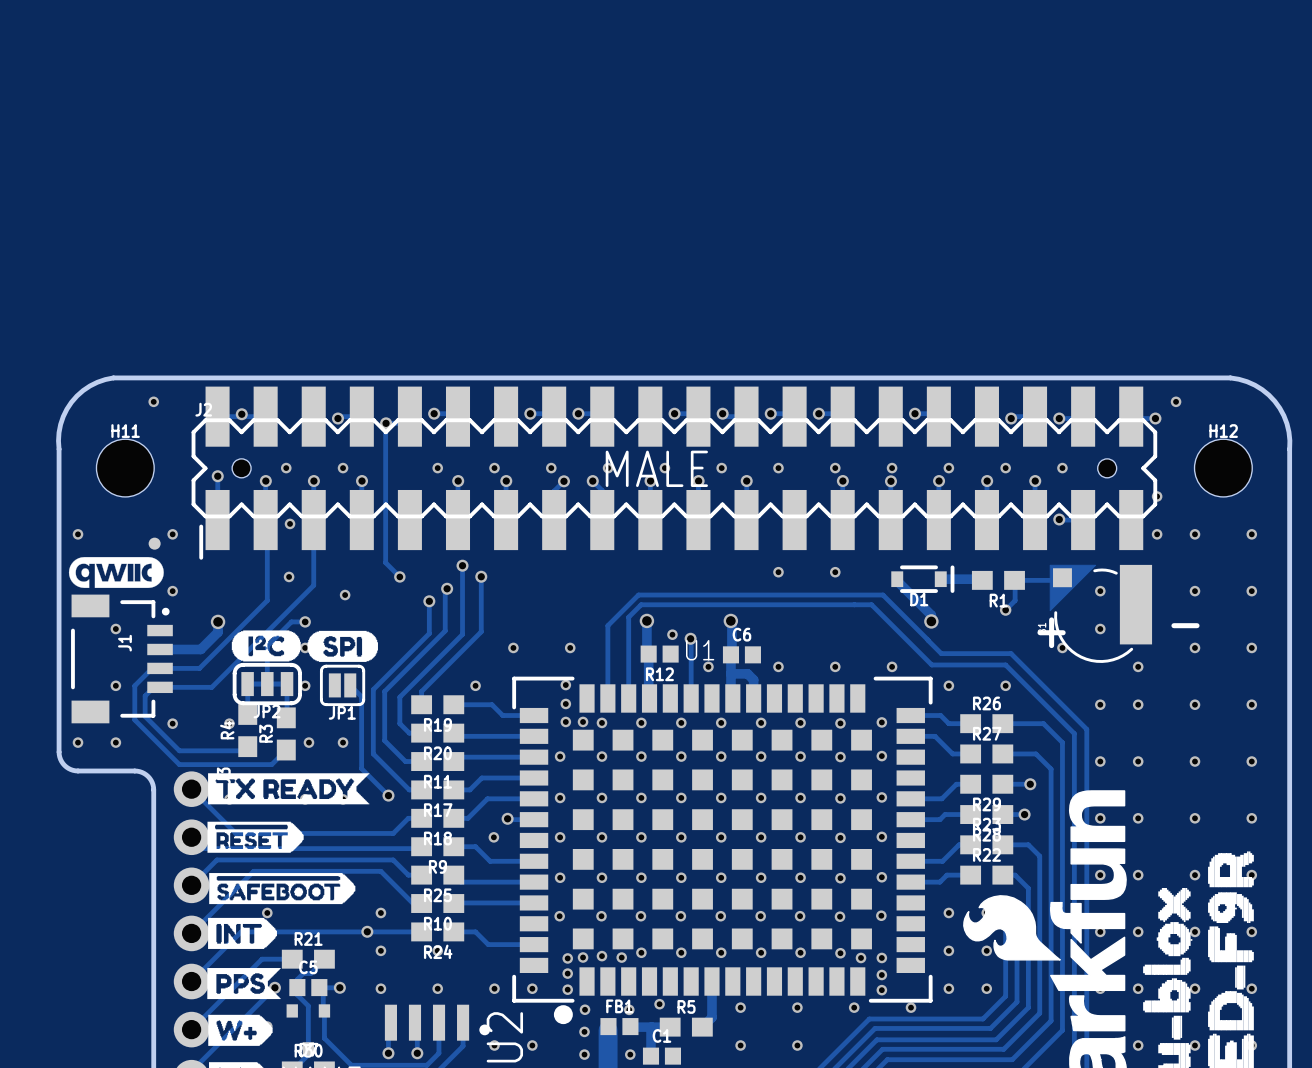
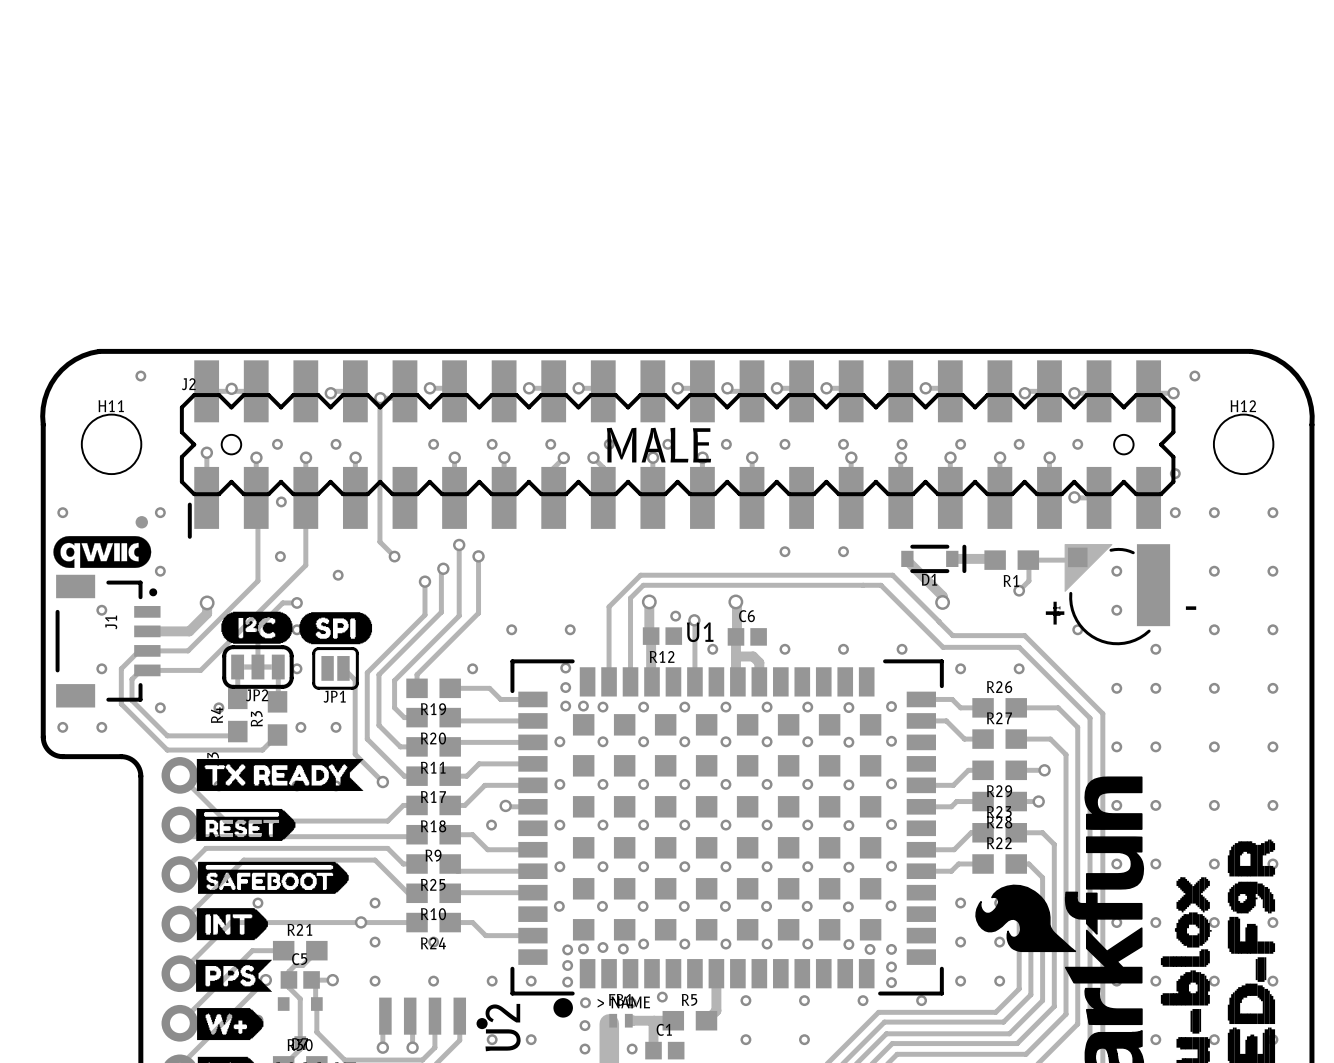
FB1 footprint: [600, 1018, 639, 1036] -> [609, 1013, 633, 1028]

